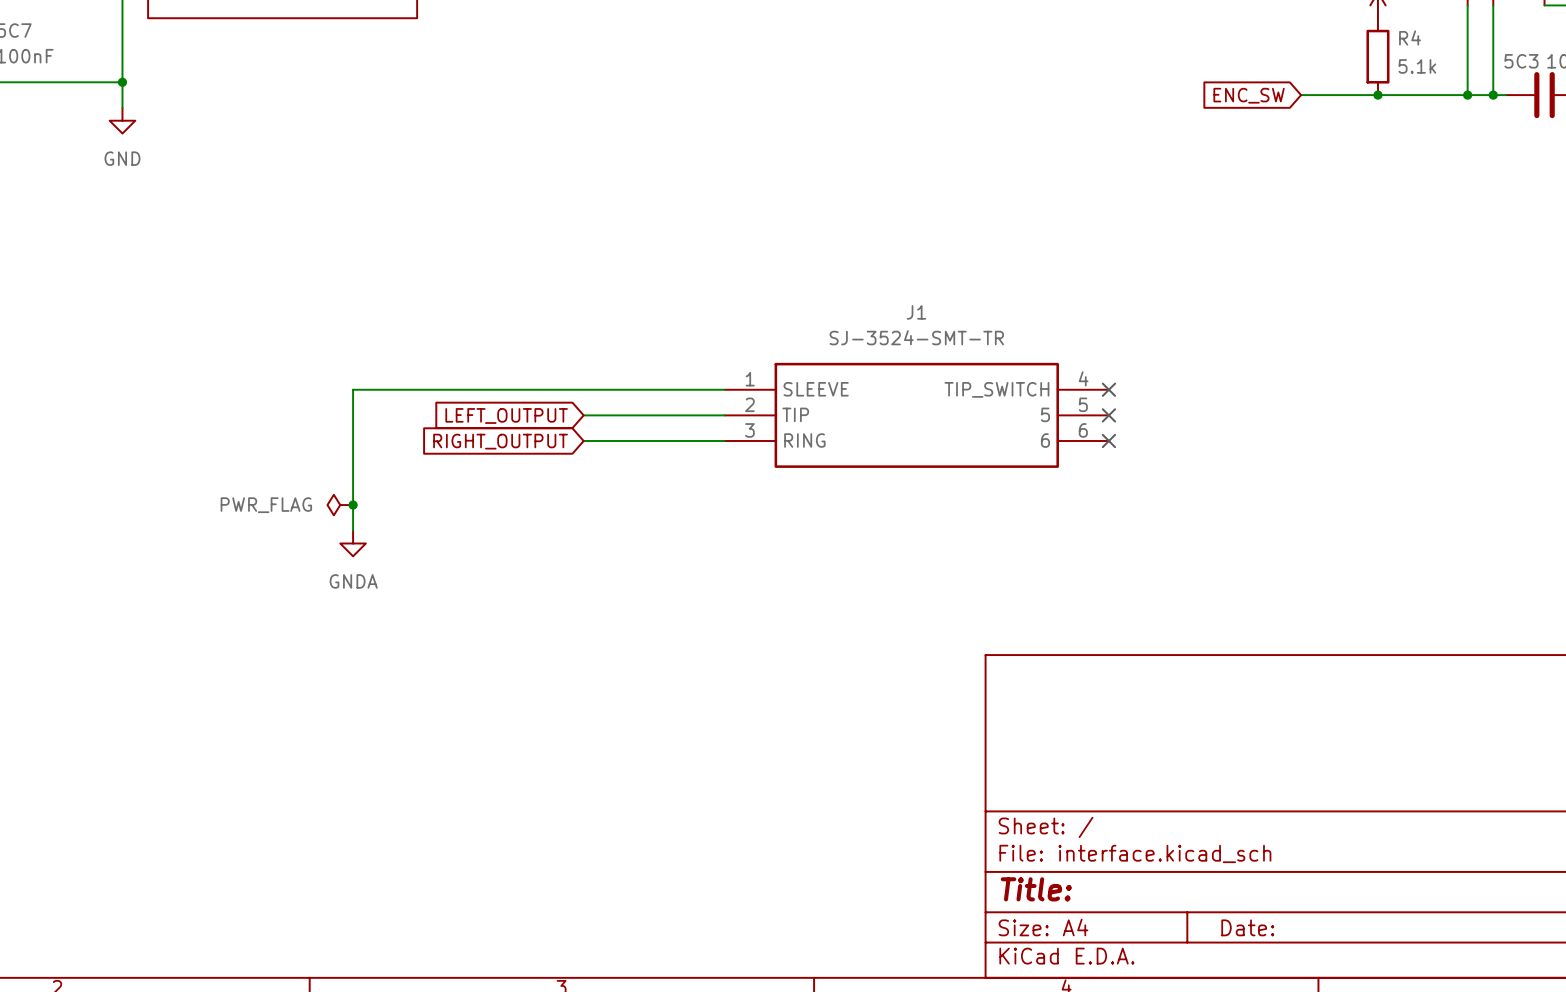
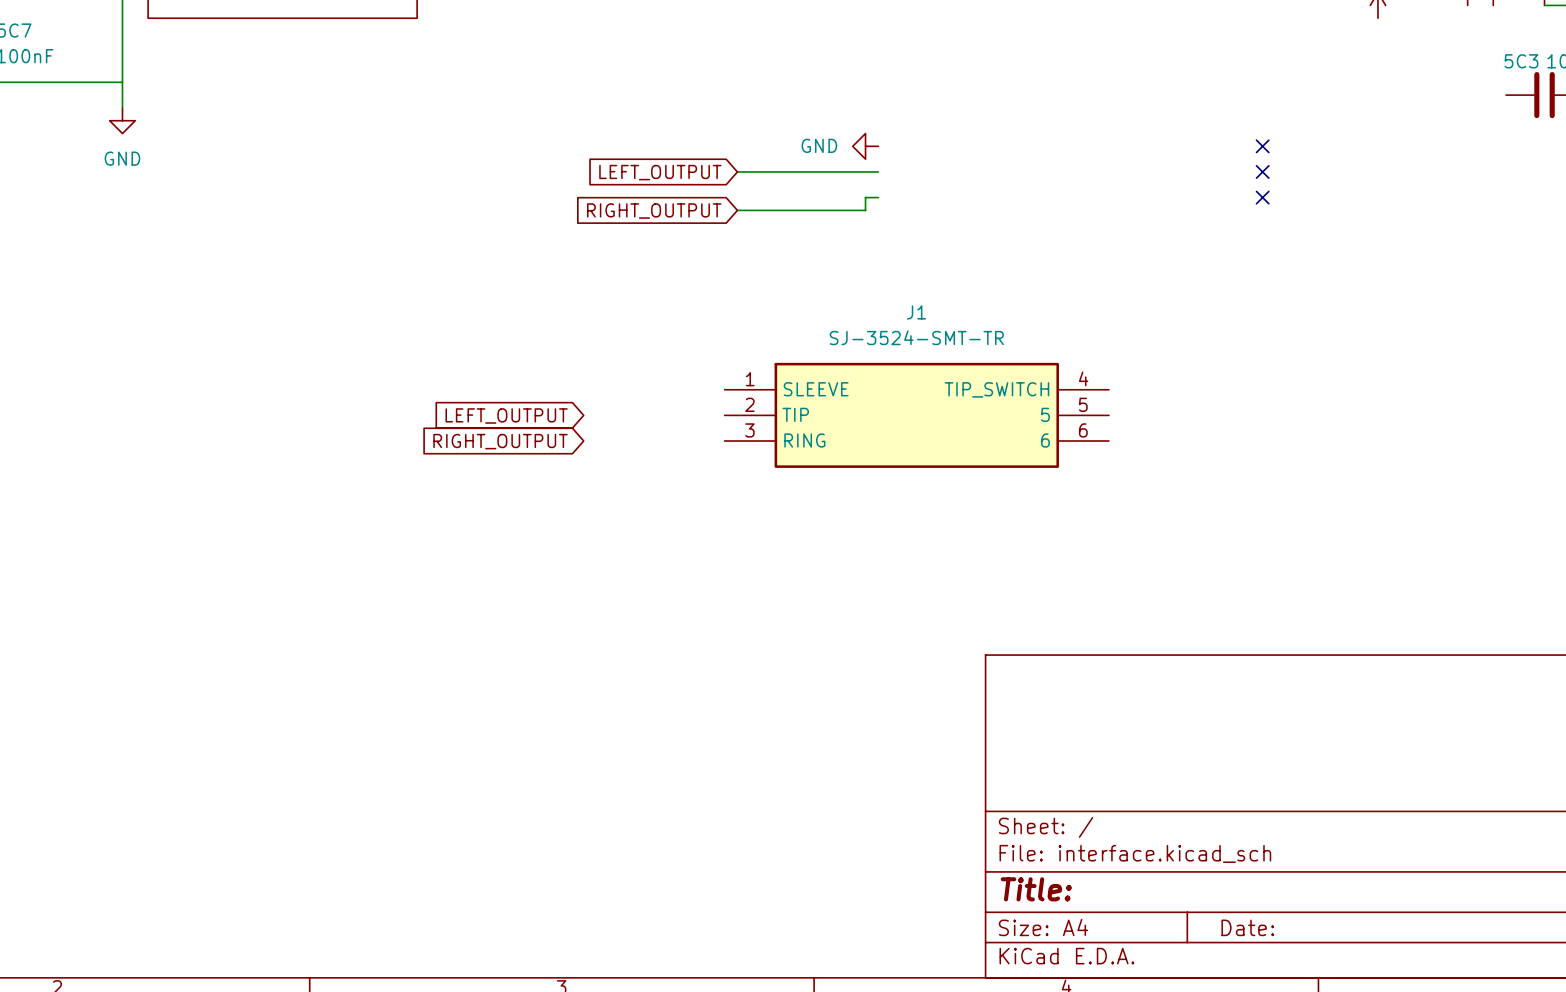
wire: (1467, 5) (1467, 95) -> none
wire: (1493, 5) (1493, 95) -> none
R4: 5.1k (1377, 56) -> none
junction: (122, 82) -> none
global label: ENC_SW (1249, 95) -> none
wire: (1301, 95) (1506, 95) -> none
junction: (1377, 95) -> none
junction: (1467, 95) -> none
junction: (1493, 95) -> none
power symbol: none -> GND (865, 146)
no-connect mark: none -> (1262, 146)
wire: none -> (737, 171) (878, 171)
no-connect mark: none -> (1262, 171)
global label: none -> LEFT_OUTPUT (660, 172)
wire: none -> (878, 197) (865, 197) (865, 210) (737, 210)
no-connect mark: none -> (1262, 197)
global label: none -> RIGHT_OUTPUT (654, 211)
wire: (724, 389) (353, 389) (353, 530) -> none
no-connect mark: (1108, 389) -> none
wire: (583, 415) (724, 415) -> none
no-connect mark: (1108, 415) -> none
wire: (583, 441) (724, 441) -> none
no-connect mark: (1108, 441) -> none
power symbol: PWR_FLAG (340, 505) -> none
junction: (353, 505) -> none
power symbol: GNDA (353, 543) -> none

